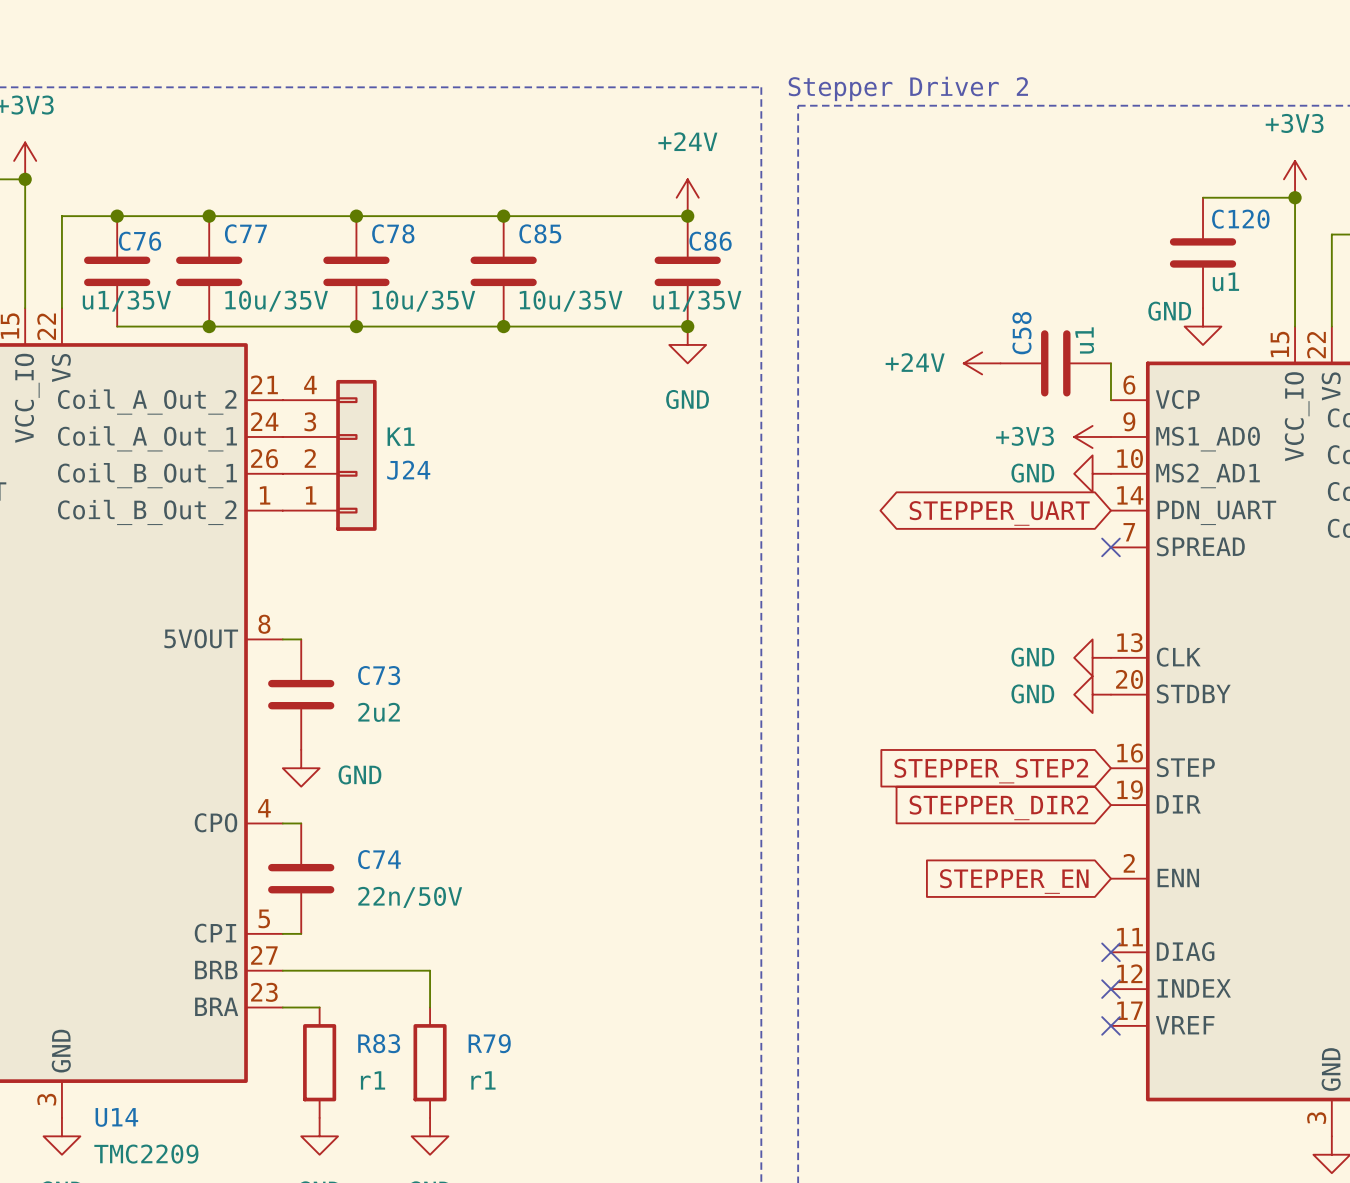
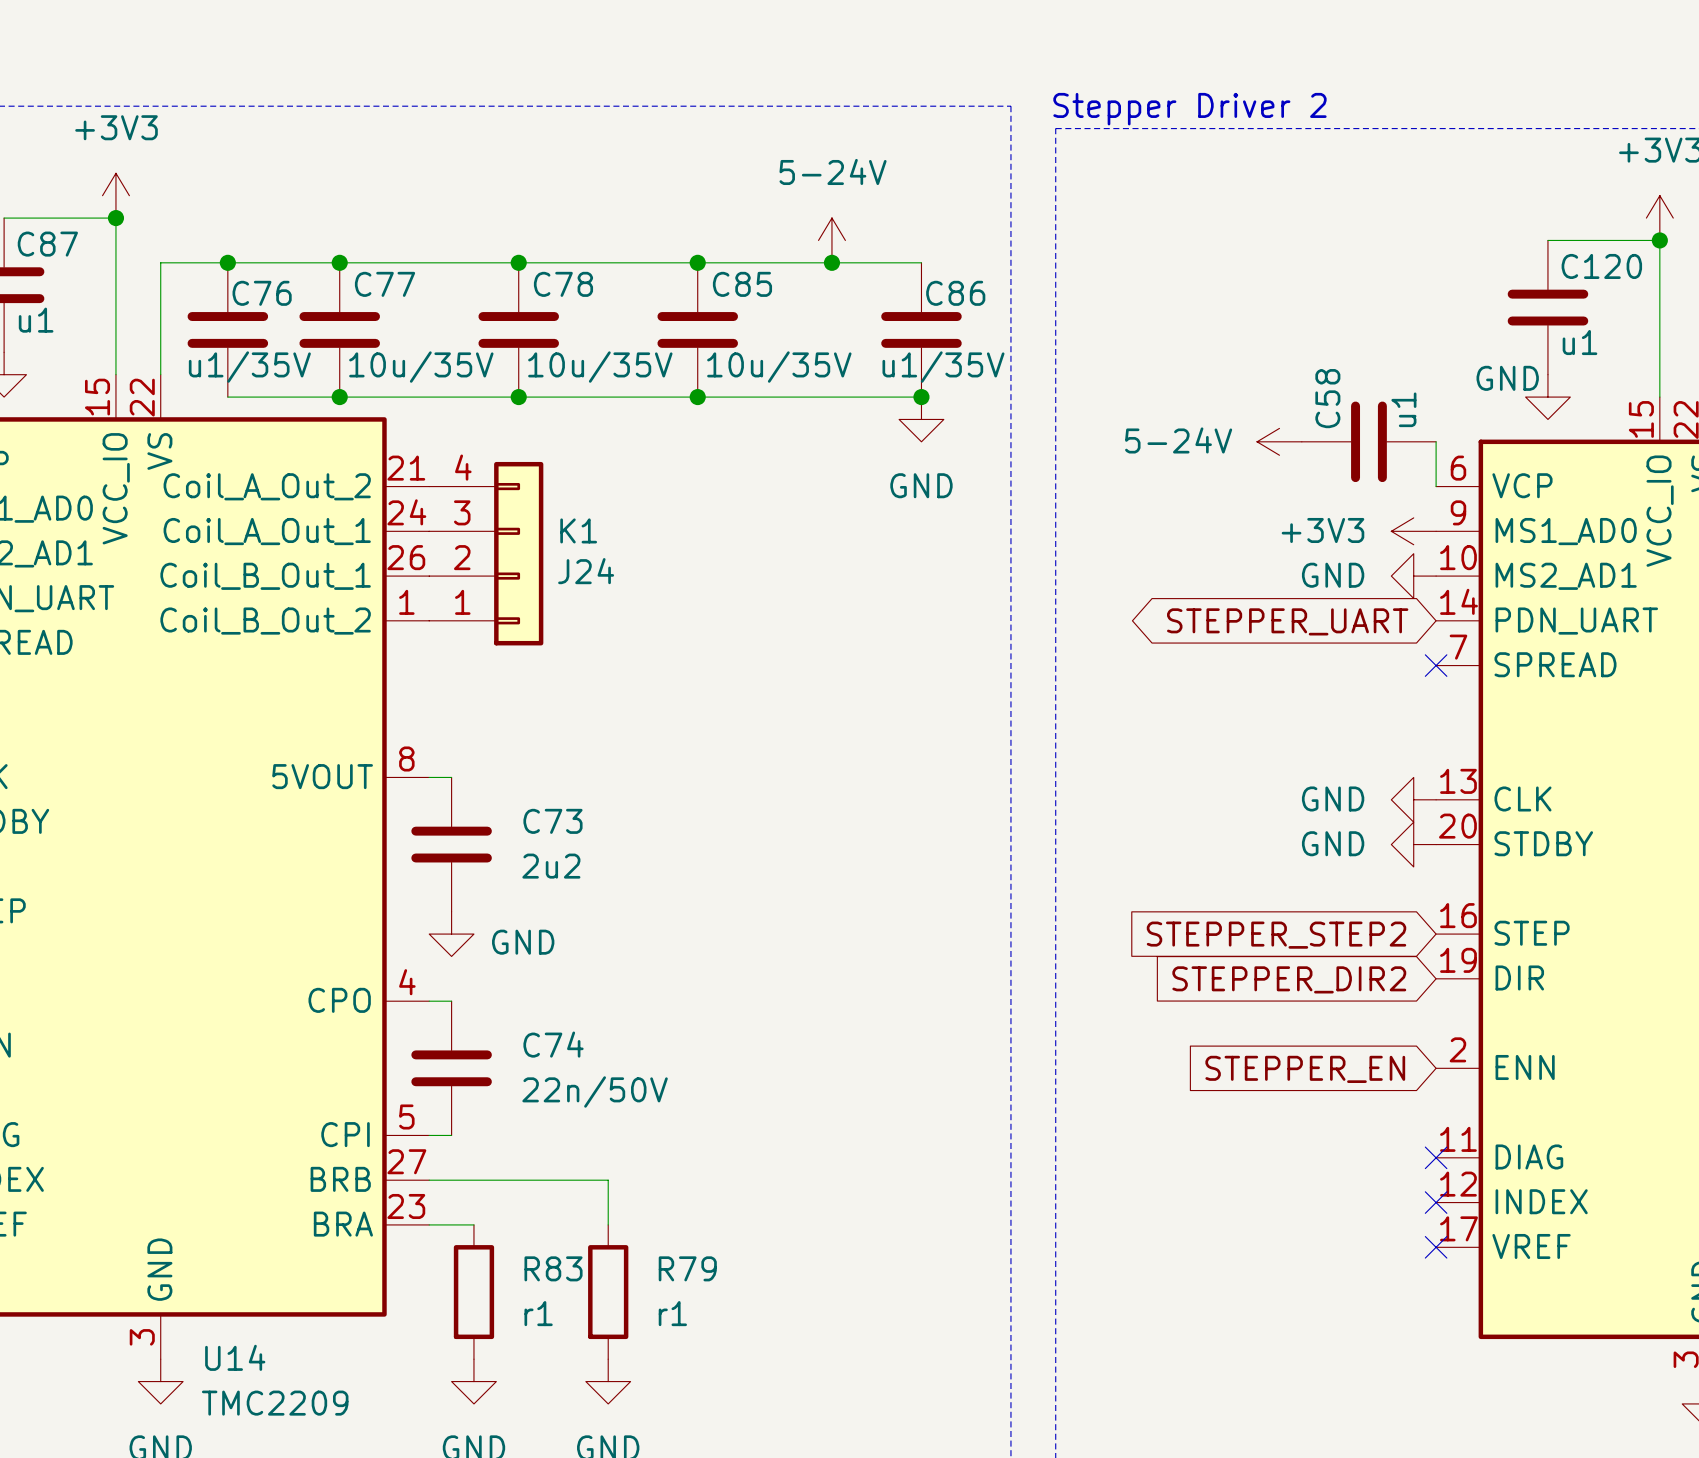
power symbol: none -> 5-24V (831, 240)
power symbol: +24V (687, 197) -> none
junction position: (687, 216) -> (831, 262)
power symbol: +24V (982, 363) -> 5-24V (1279, 441)

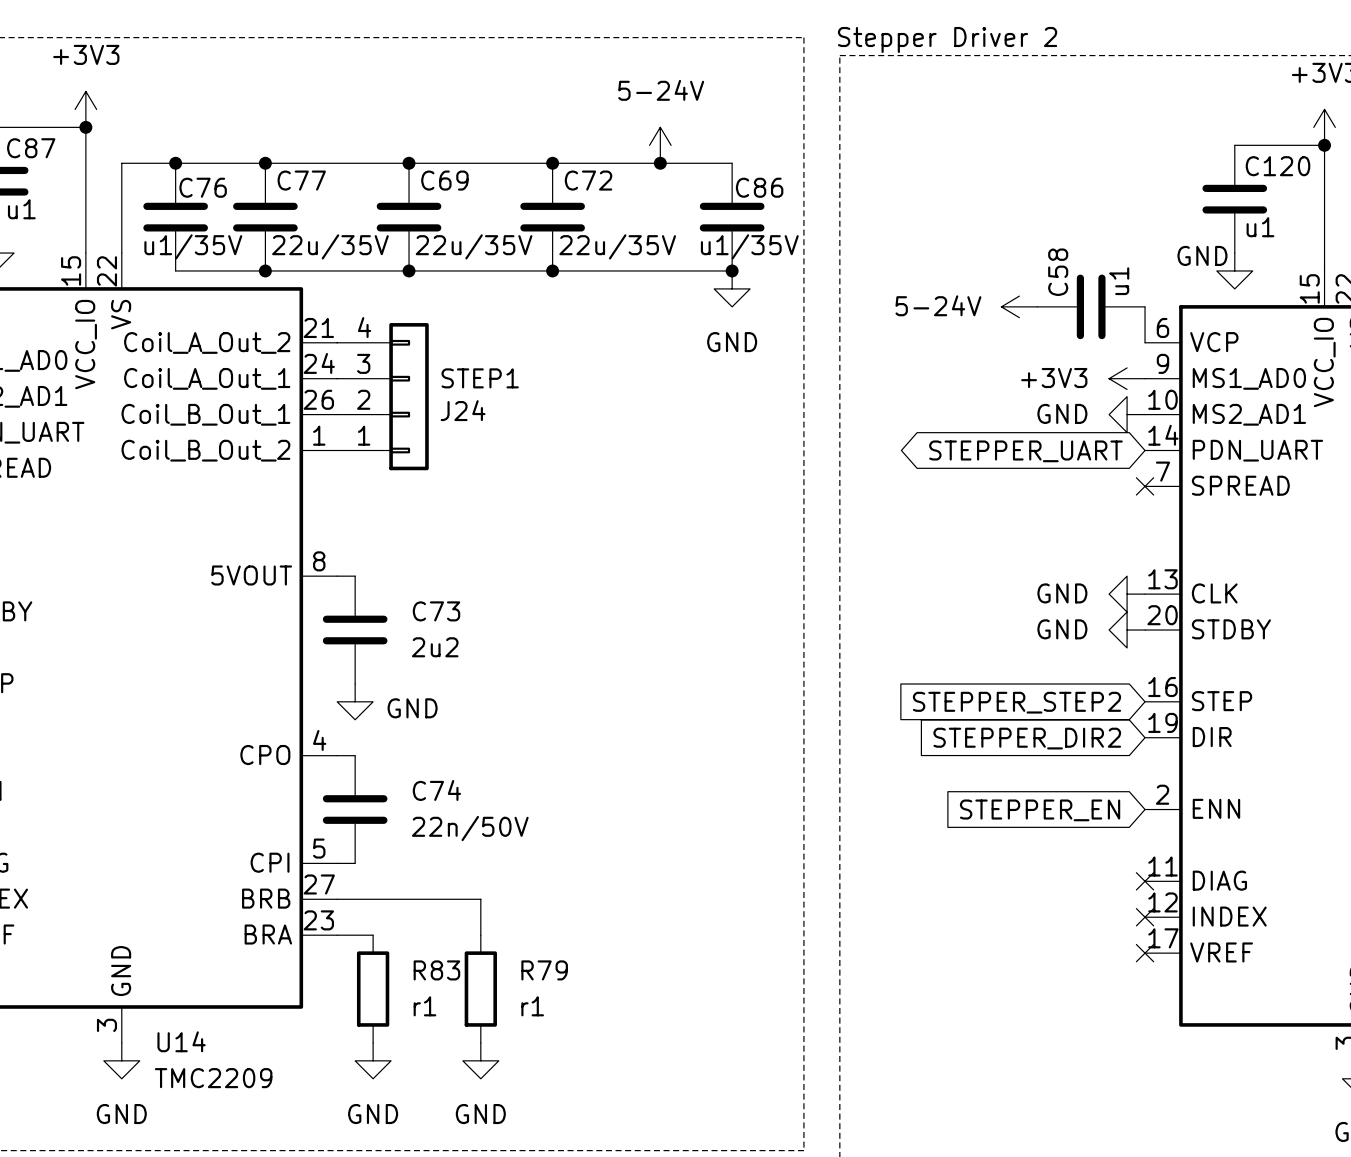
C78 name: C78 (563, 284) -> C69 (444, 180)
C85 name: C85 (742, 284) -> C72 (588, 180)
C77 value: 10u/35V (421, 367) -> 22u/35V (330, 246)
C78 value: 10u/35V (600, 367) -> 22u/35V (474, 246)
C85 value: 10u/35V (779, 367) -> 22u/35V (617, 246)
J24 value: K1 (578, 530) -> STEP1 (480, 378)

